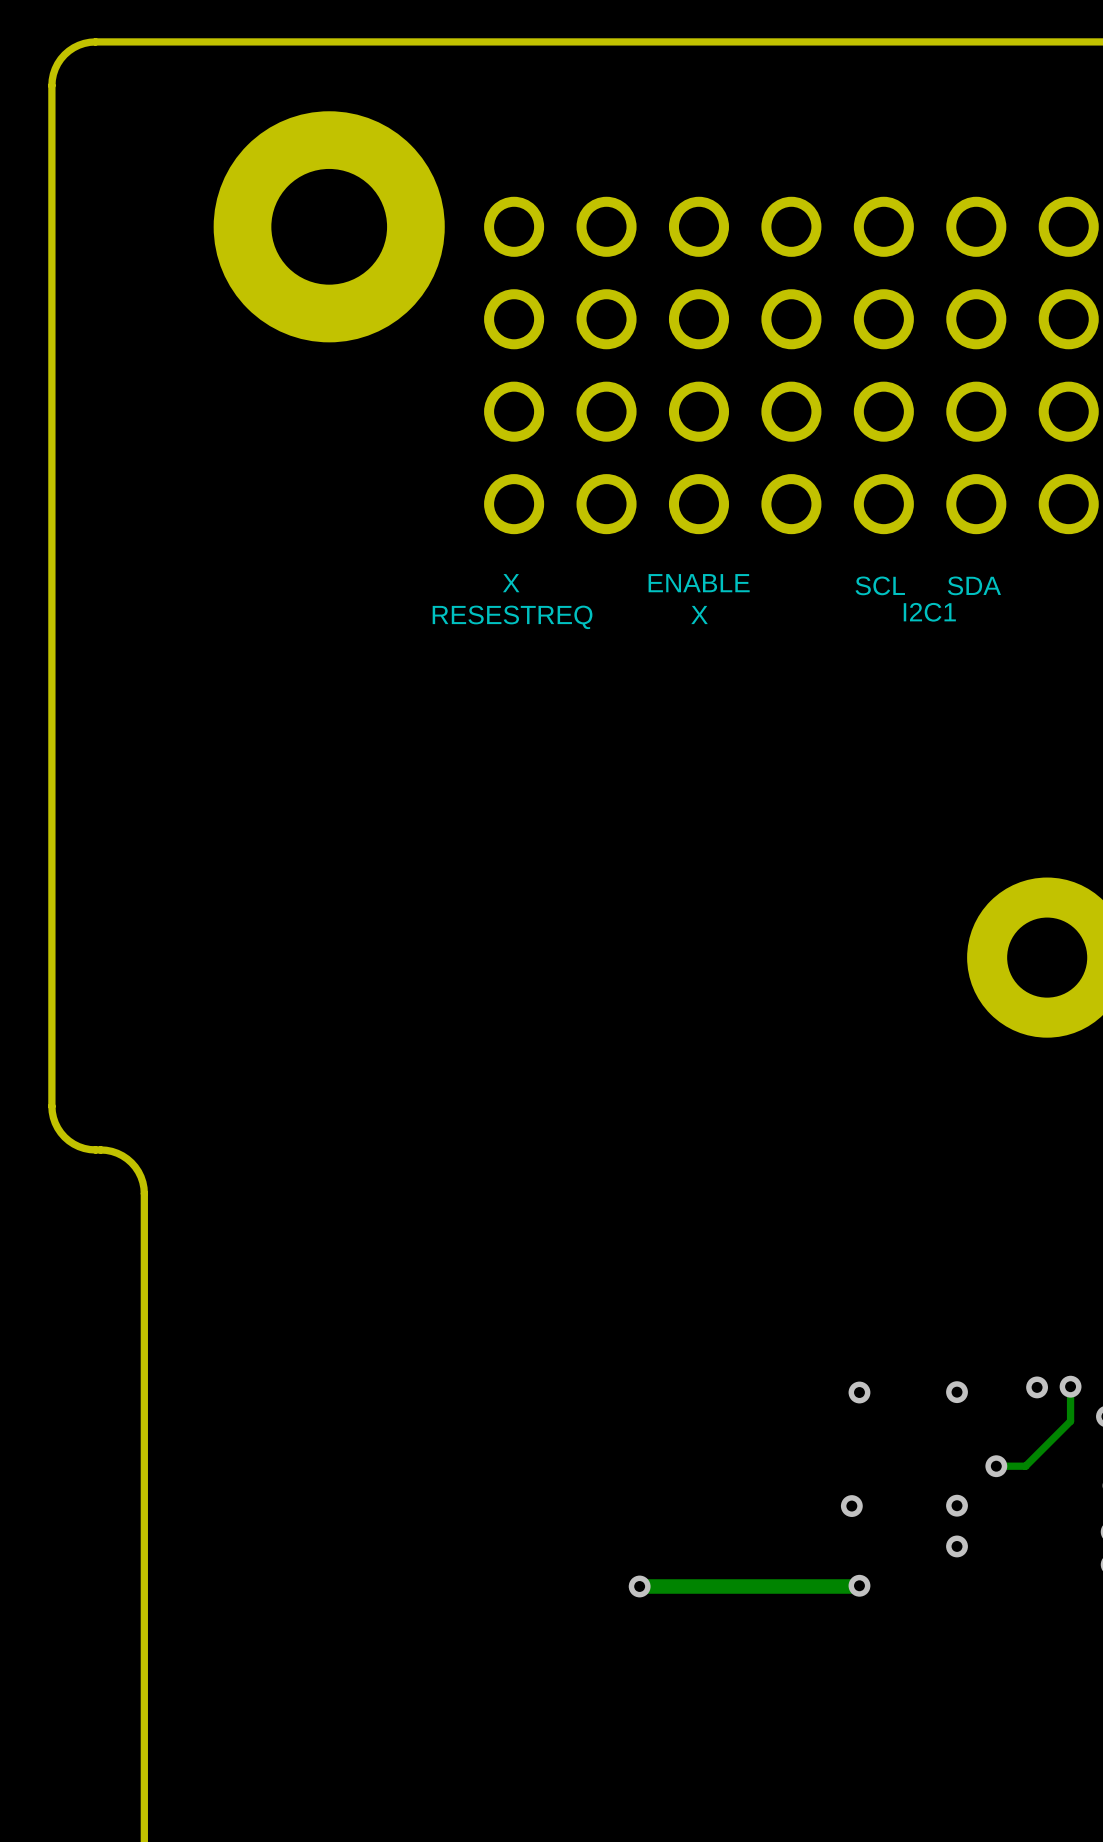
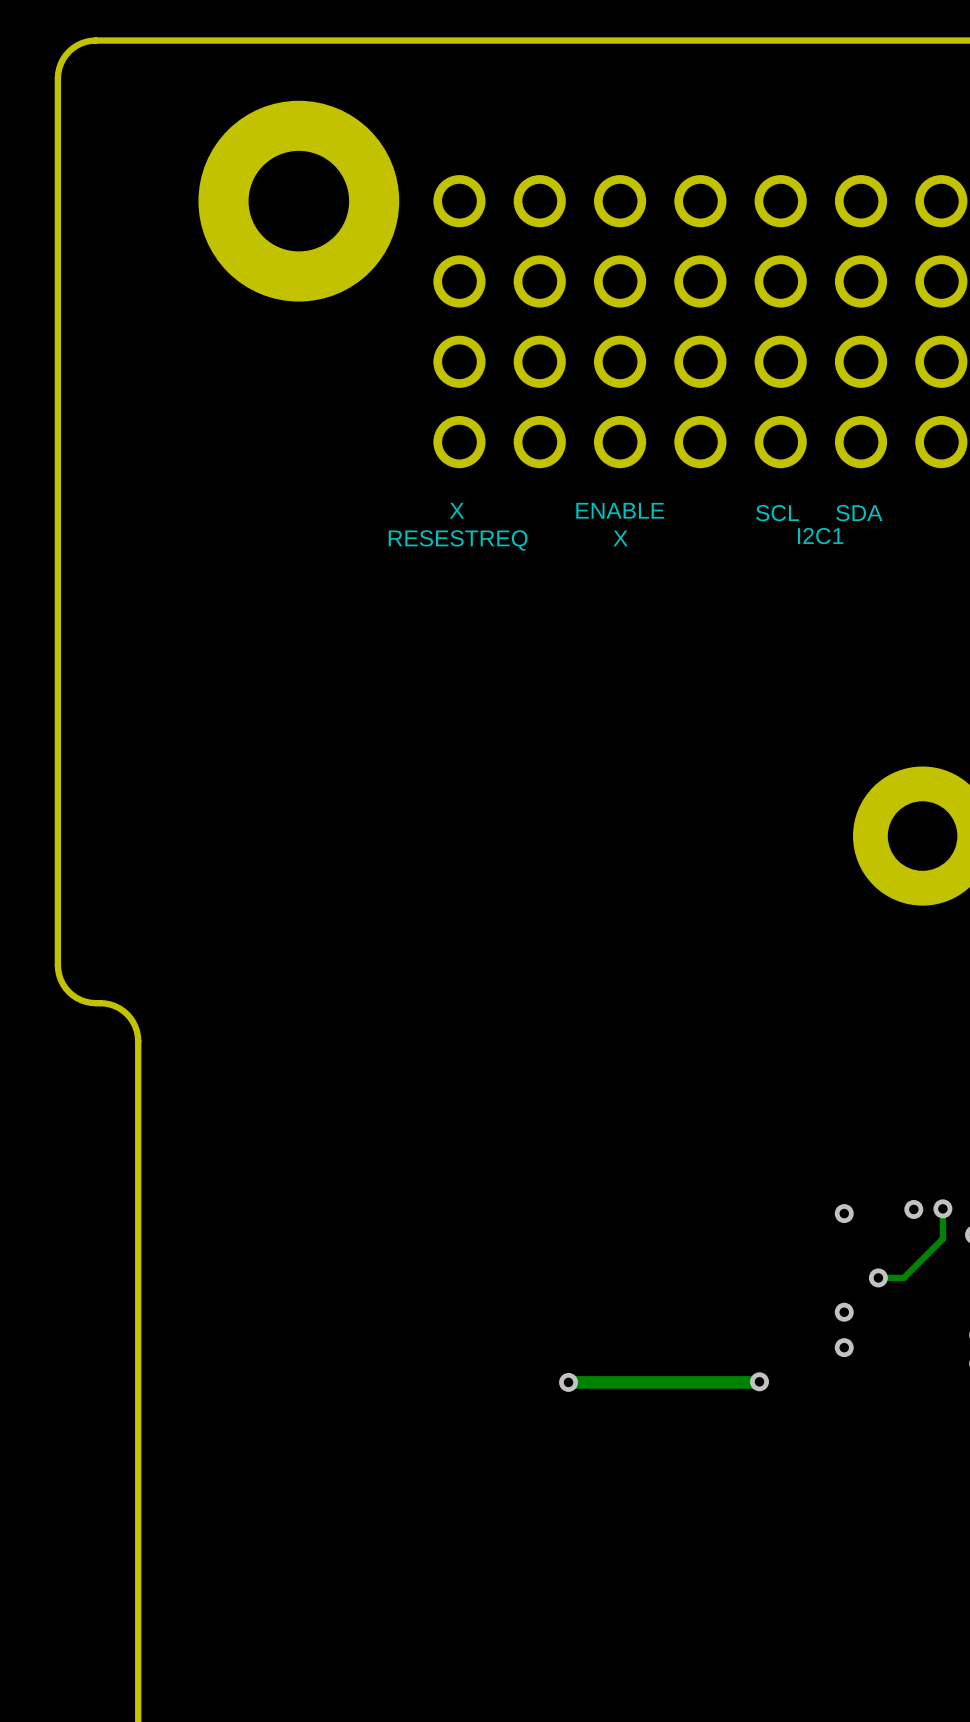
via: (859, 1392) -> none
via: (851, 1506) -> none

